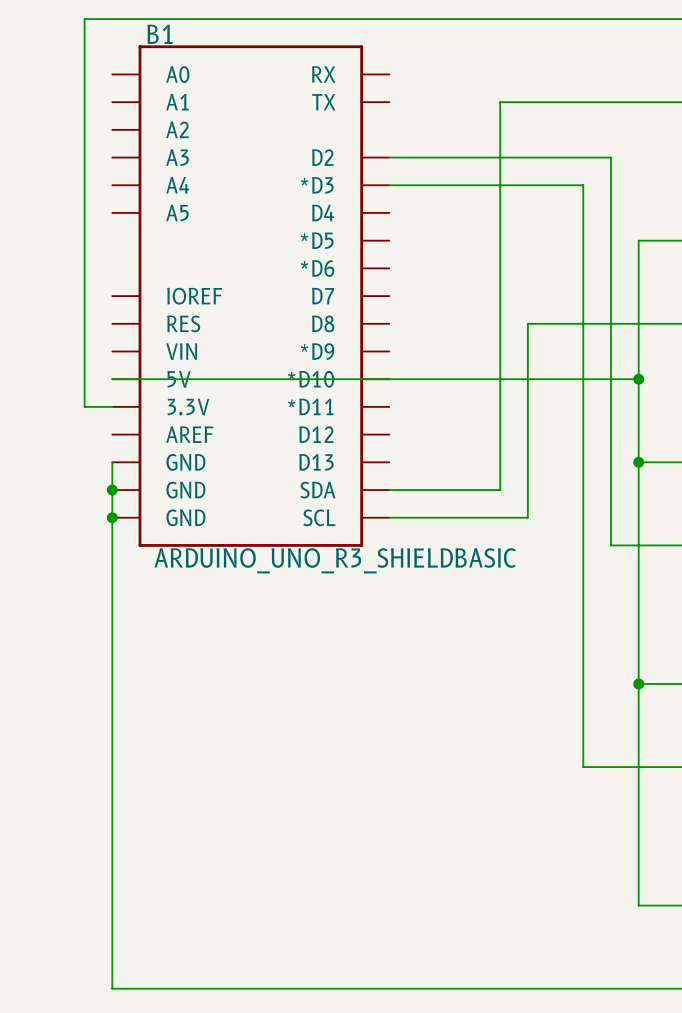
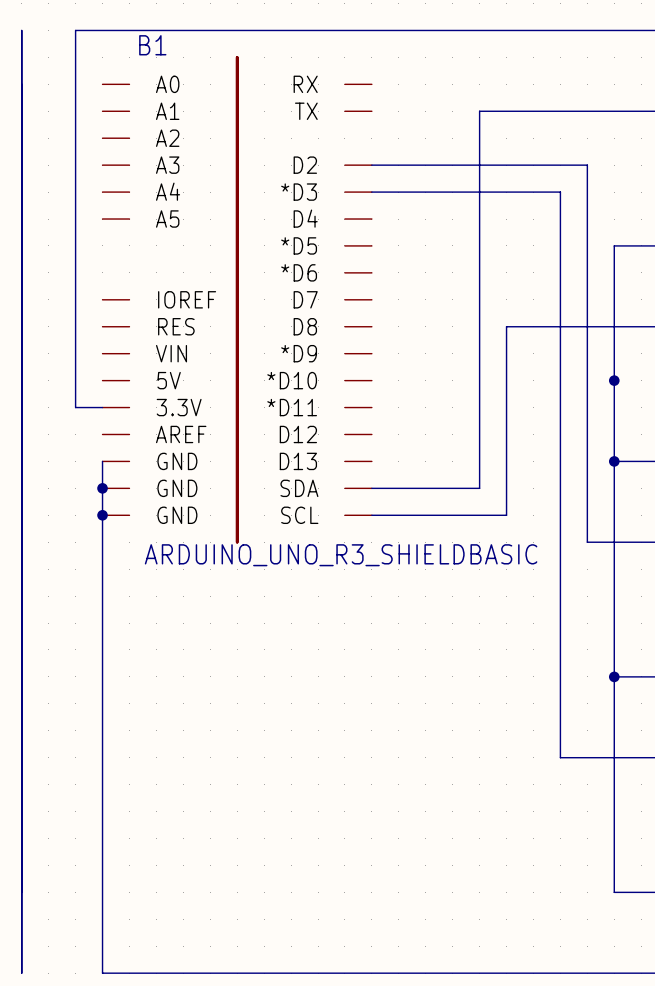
wire: none -> (21, 30) (21, 973)
B1 symbol: [112, 45, 390, 547] -> [102, 56, 372, 544]
wire: (112, 379) (638, 379) -> none

